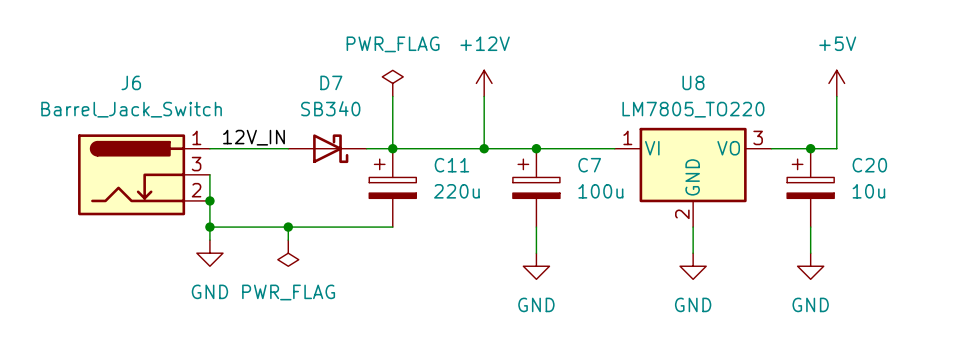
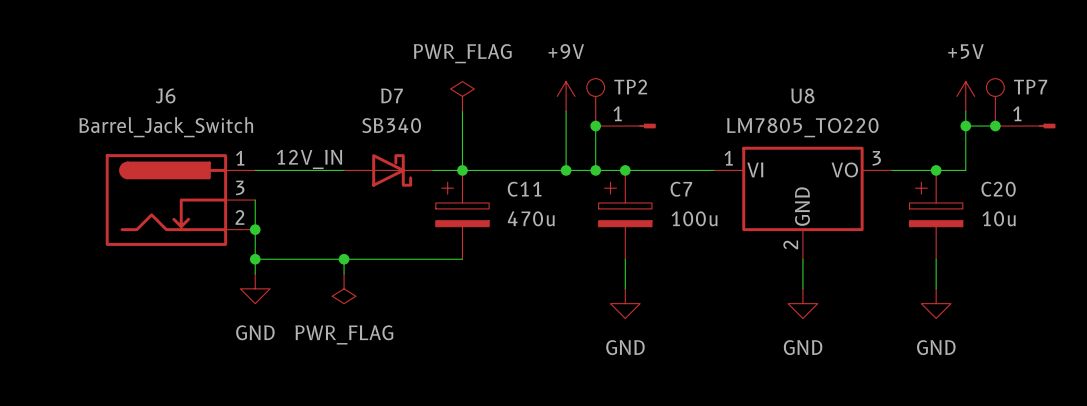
power symbol: +12V (484, 83) -> +9V (566, 96)
TP2: none -> (595, 102)
TP7: none -> (995, 102)
wire: none -> (595, 126) (595, 170)
junction: none -> (595, 126)
part: none -> (625, 126)
wire: none -> (965, 126) (995, 126)
junction: none -> (965, 126)
junction: none -> (995, 126)
part: none -> (1025, 126)
junction: none -> (595, 170)
C11 value: 220u (456, 191) -> 470u (531, 218)

